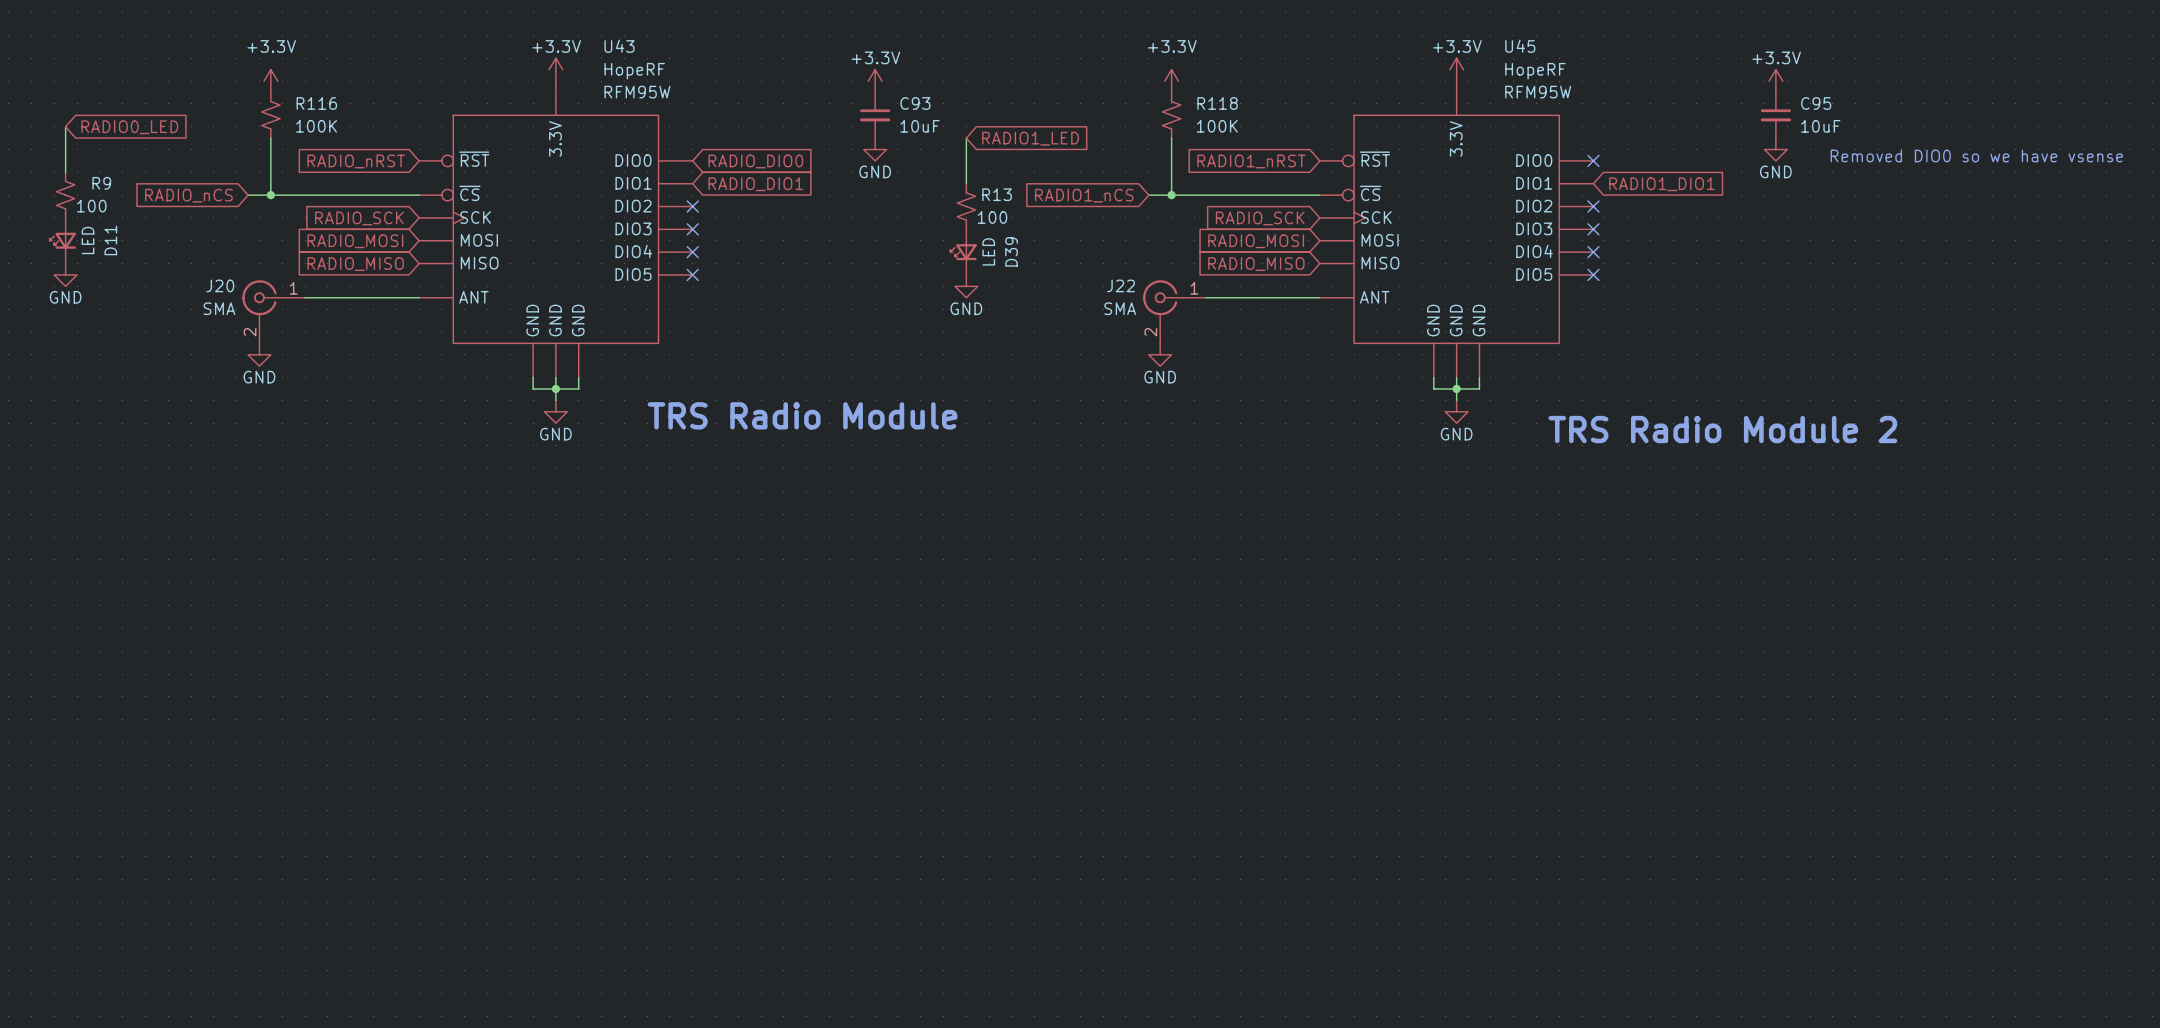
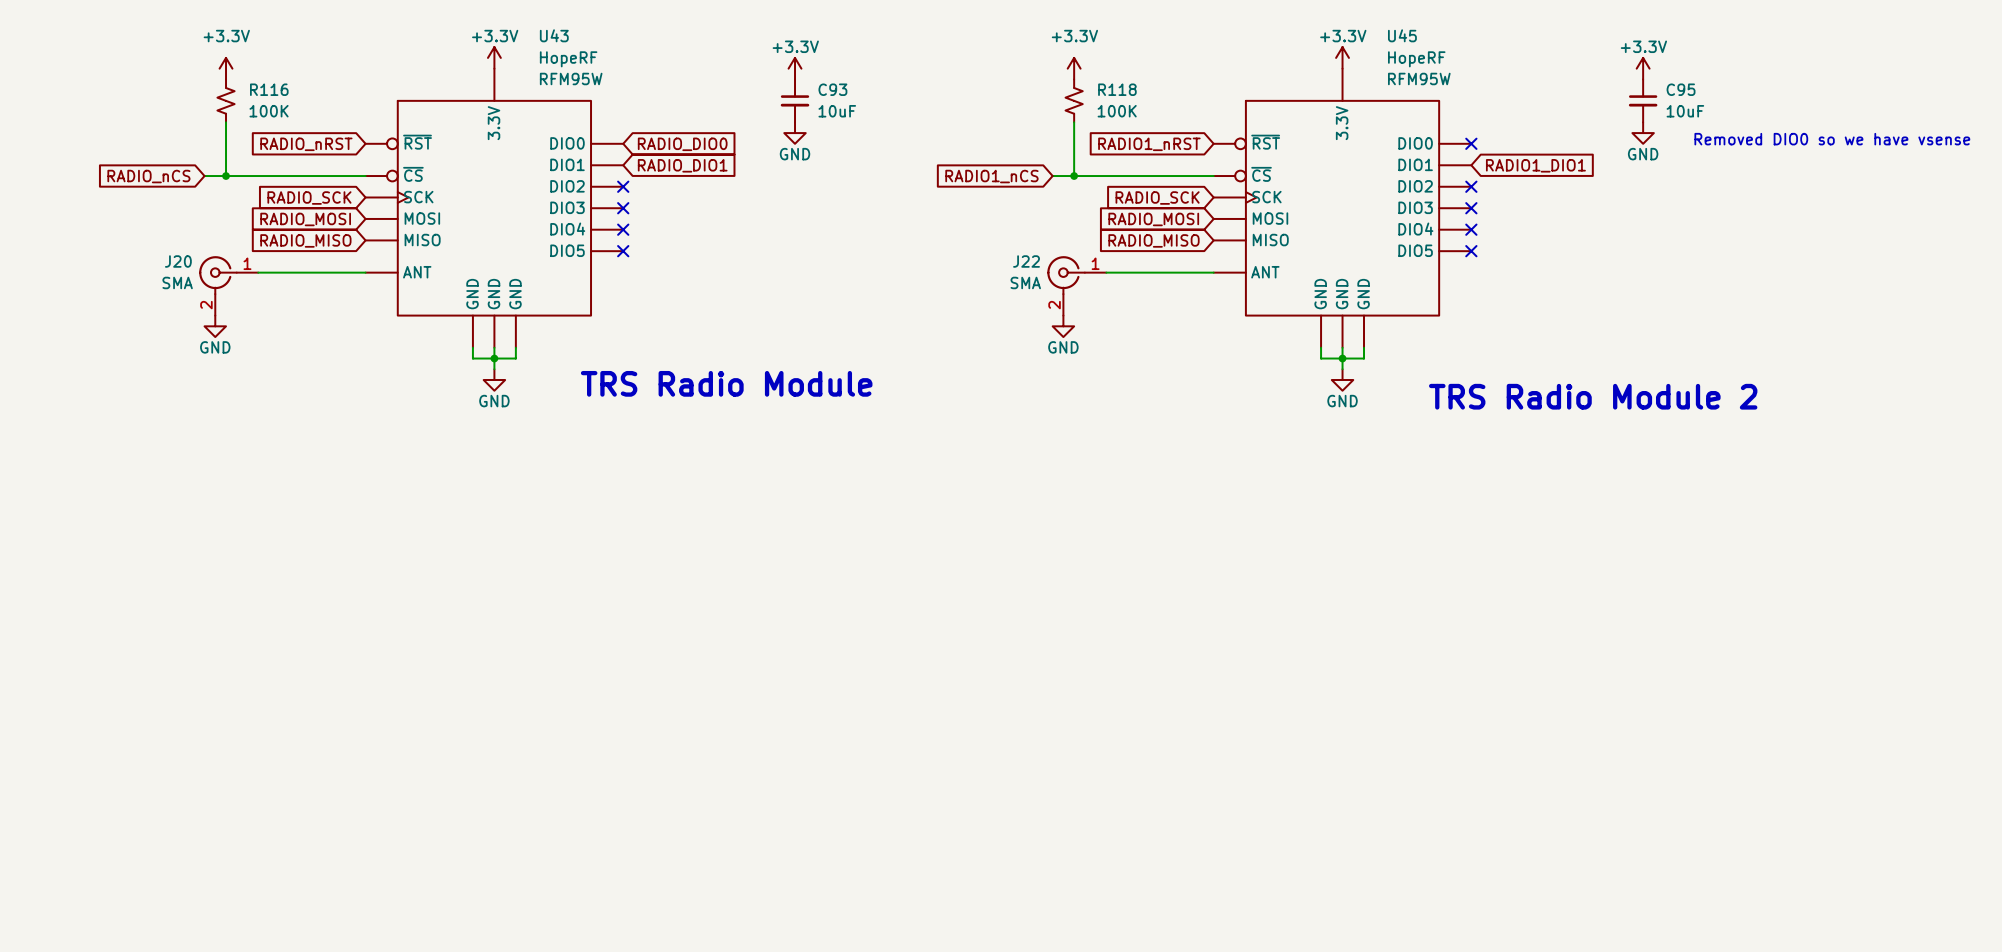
wire: (65, 126) (65, 172) -> none
global label: RADIO0_LED (129, 127) -> none
wire: (966, 138) (966, 183) -> none
global label: RADIO1_LED (1030, 138) -> none
R9: 100 (65, 195) -> none
R13: 100 (966, 206) -> none
D11: LED (62, 240) -> none
D39: LED (963, 252) -> none
power symbol: GND (65, 274) -> none
power symbol: GND (966, 286) -> none

